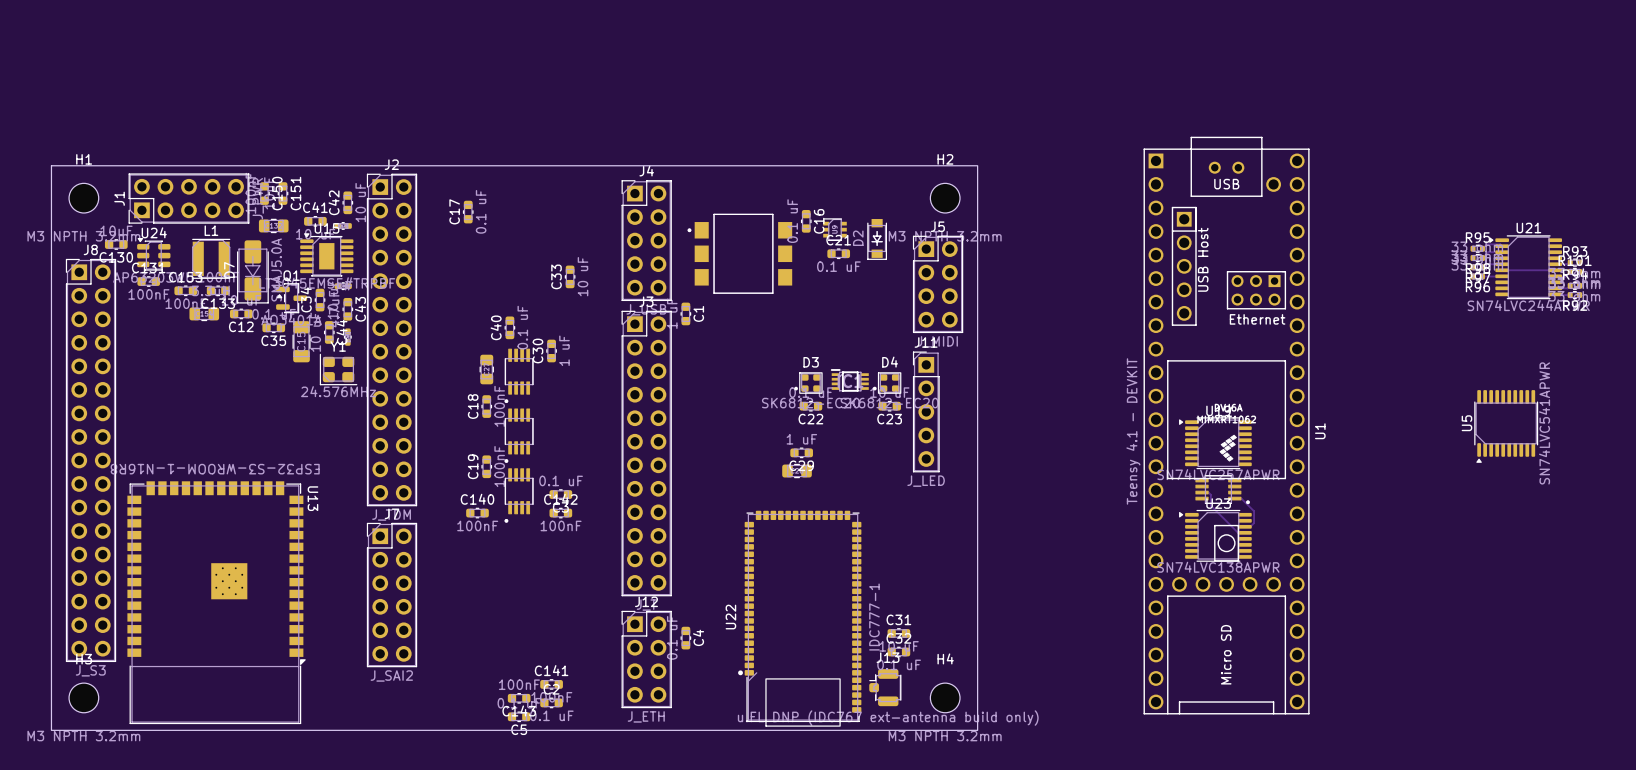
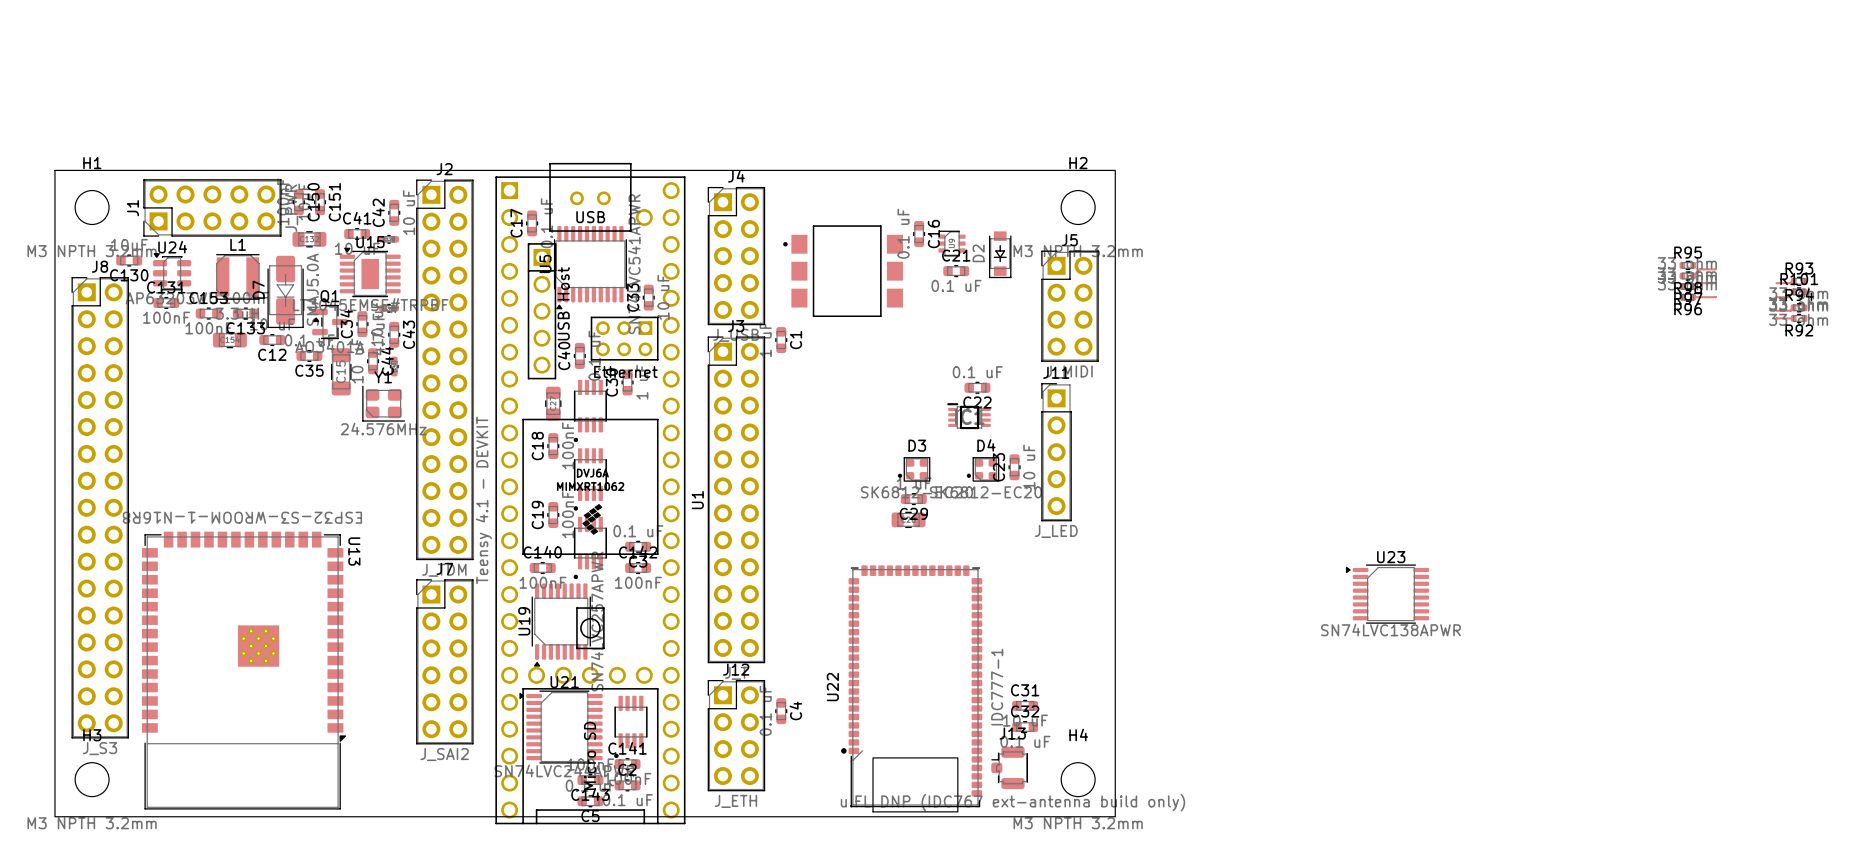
track: (1502, 246) (1500, 244) (1486, 244) (1482, 248) -> none
U21 position: (1525, 267) -> (561, 727)
track: (1502, 270) (1555, 270) -> none
D3 position: (808, 383) -> (914, 469)
D4 position: (887, 383) -> (983, 469)
C22 position: (810, 406) -> (977, 387)
C23 rotation: 0° (889, 406) -> 90° clockwise (1014, 467)
C23 position: (889, 406) -> (1014, 467)
U1 position: (1226, 425) -> (590, 493)
U5 position: (1506, 426) -> (590, 267)
U19 rotation: 0° (1215, 443) -> 90° counterclockwise (561, 625)
U19 position: (1215, 443) -> (561, 625)
part: (1222, 489) -> none
track: (1202, 492) (1208, 492) (1210, 494) (1210, 505) (1238, 532) (1244, 532) -> none
track: (1234, 498) (1241, 498) (1254, 511) (1254, 523) (1250, 526) (1244, 526) -> none
part: none -> (630, 726)

